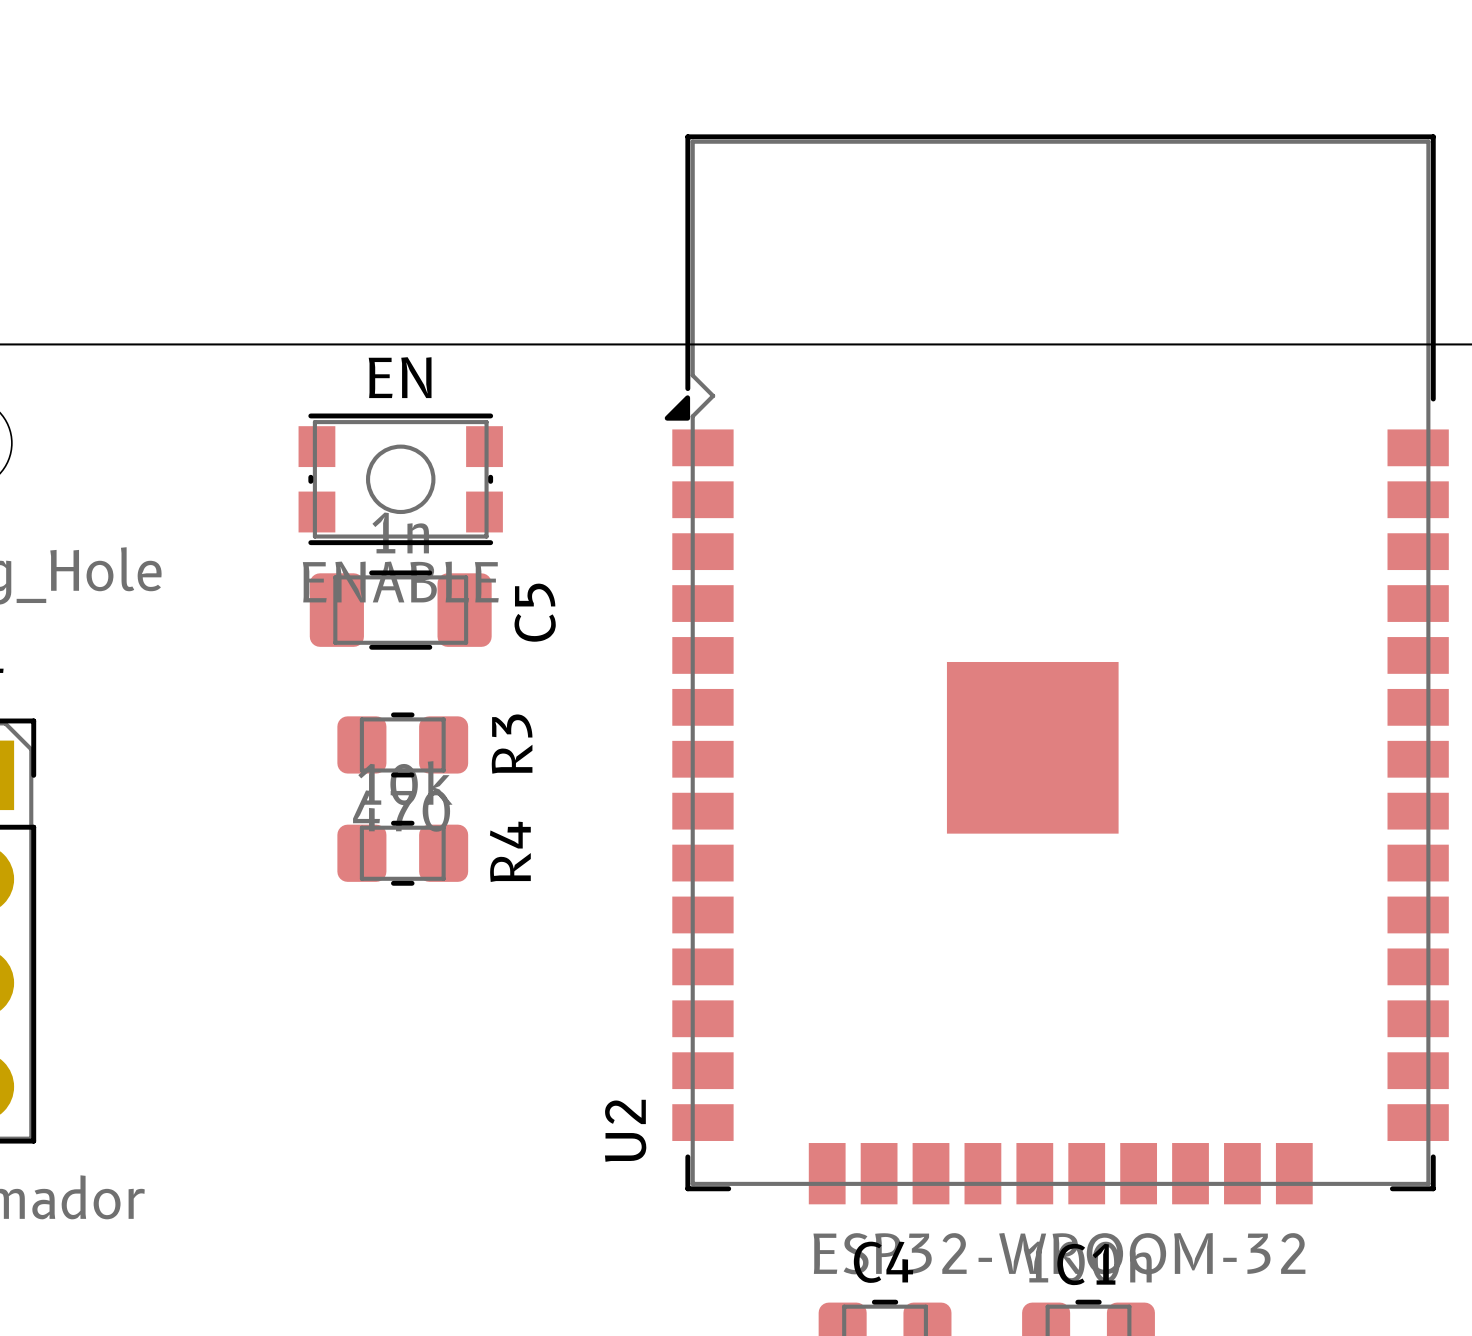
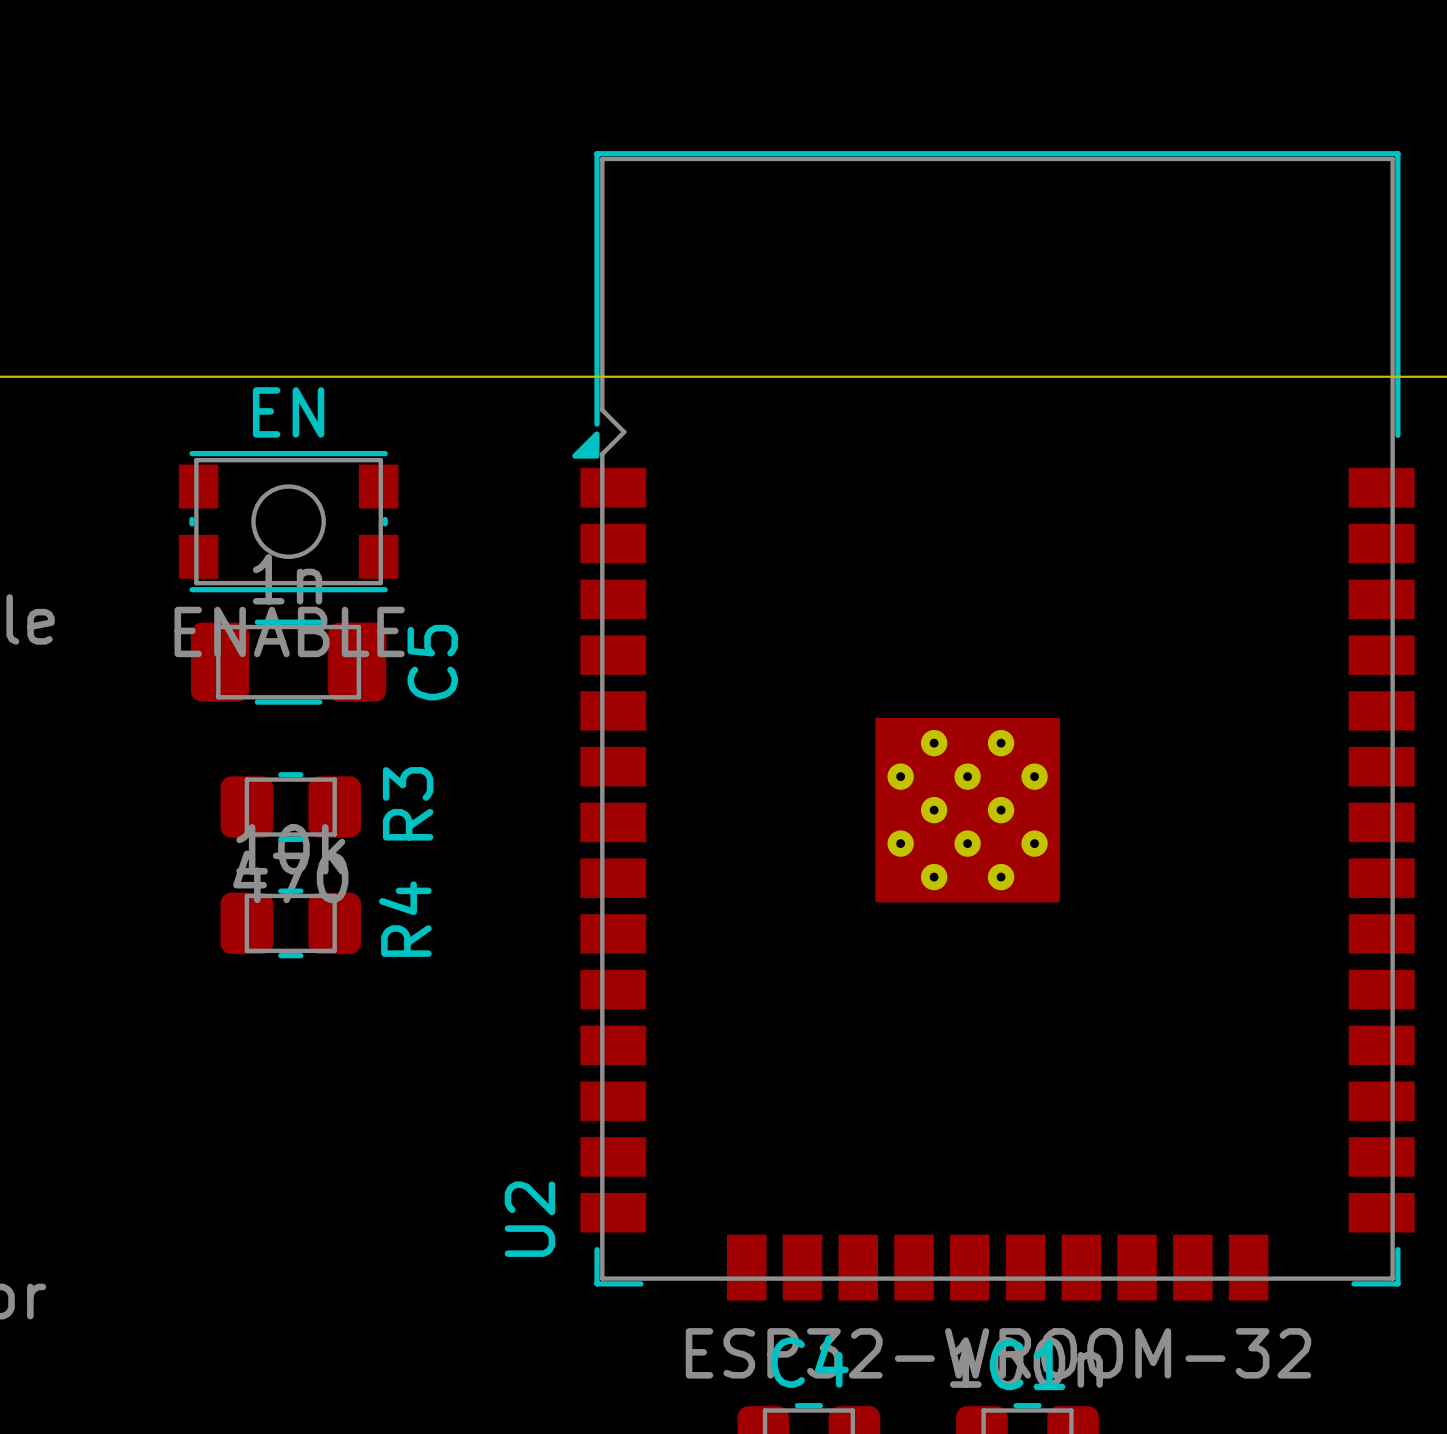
U2 footprint: [664, 134, 1449, 1205] -> [572, 151, 1415, 1301]

